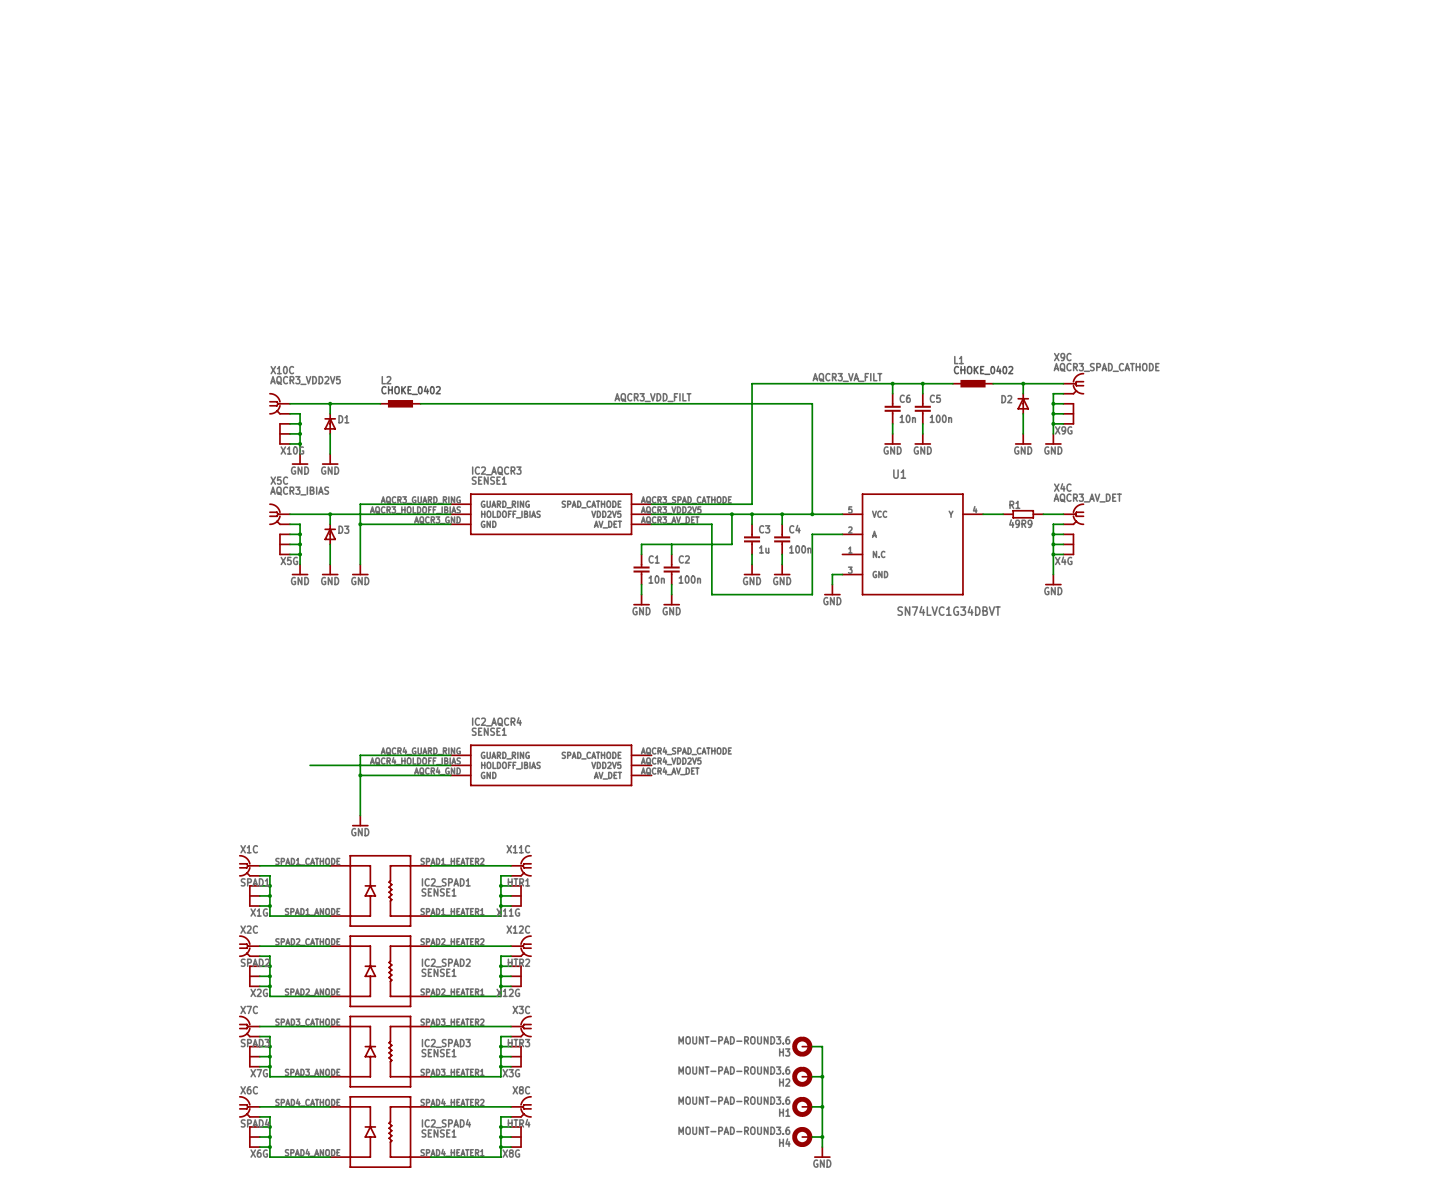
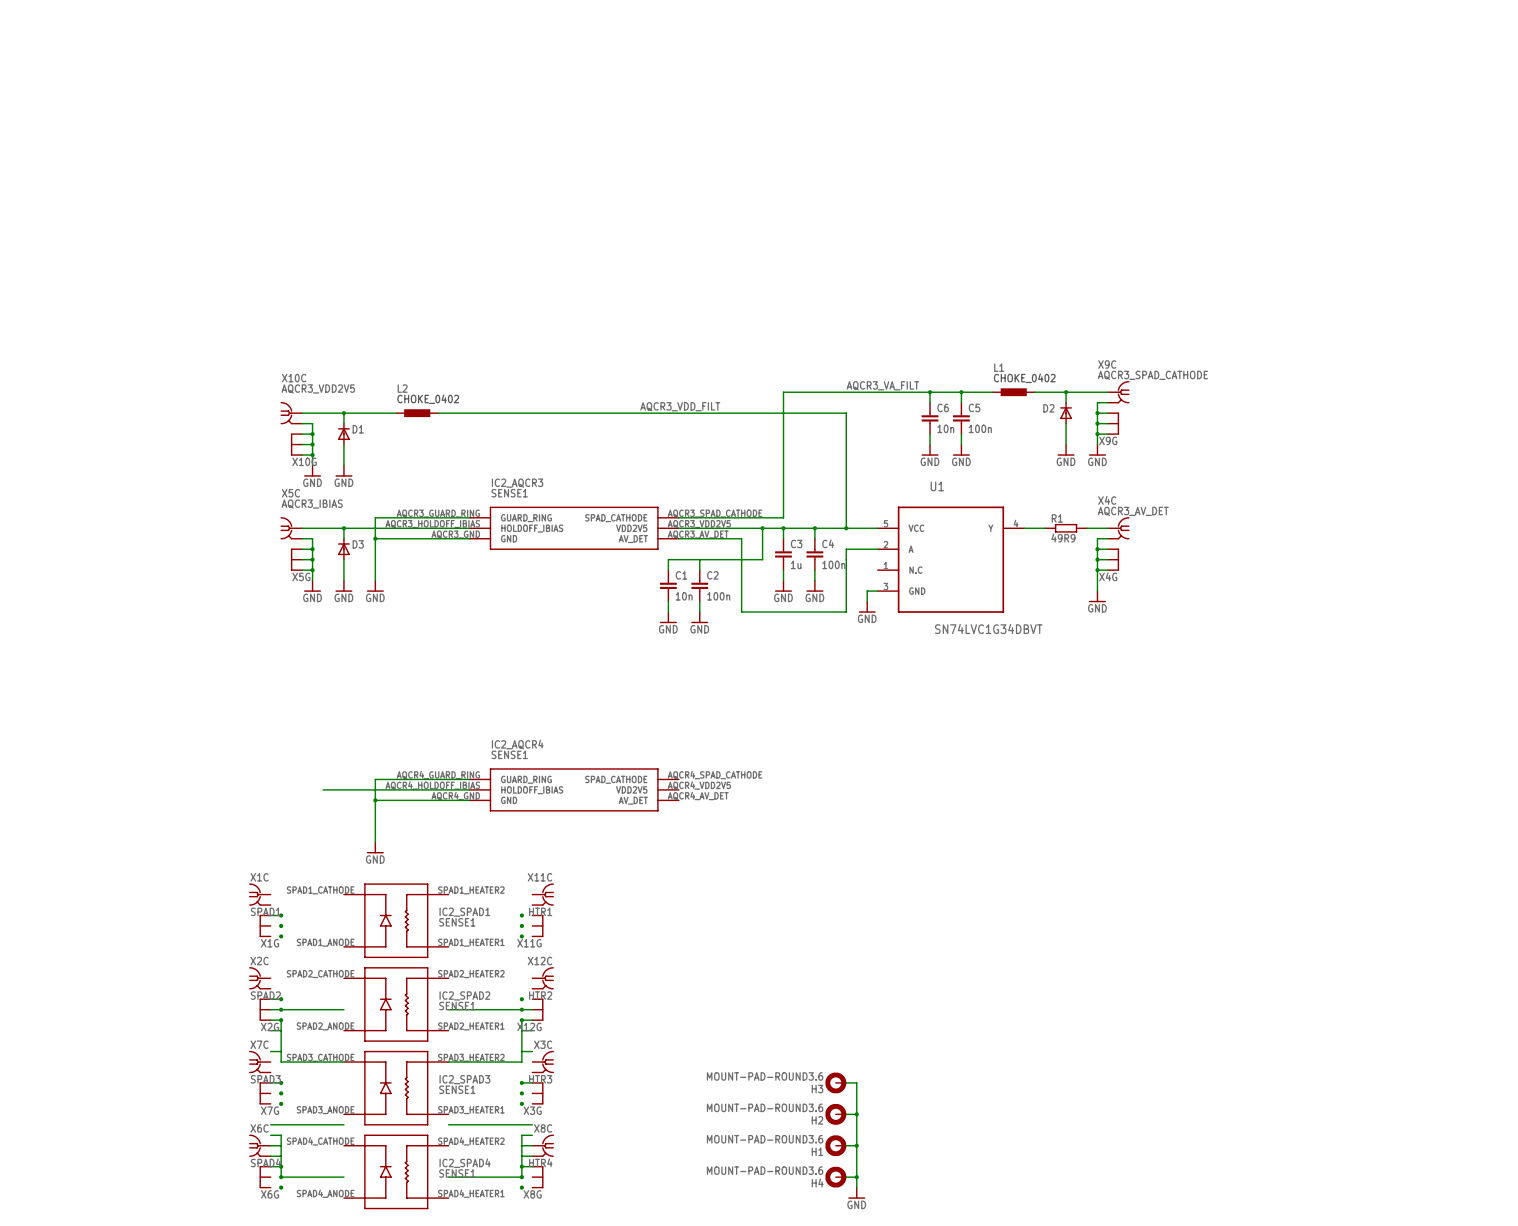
wire: (259, 865) (330, 865) -> none
wire: (430, 865) (510, 865) -> none
wire: (259, 875) (269, 875) (269, 916) (330, 916) -> none
wire: (510, 875) (500, 875) (500, 916) (430, 916) -> none
wire: (500, 885) (510, 885) -> none
wire: (259, 895) (269, 895) -> none
wire: (500, 895) (510, 895) -> none
wire: (259, 905) (269, 905) -> none
wire: (500, 905) (510, 905) -> none
wire: (259, 946) (330, 946) -> none
wire: (430, 946) (510, 946) -> none
wire: (259, 956) (269, 956) (269, 986) -> none
wire: (510, 956) (500, 956) (500, 986) -> none
wire: (500, 966) (510, 966) -> none
wire: (269, 996) (330, 996) -> (281, 1009) (343, 1009)
wire: (430, 996) (500, 996) -> (448, 1009) (521, 1009)
wire: (259, 1026) (269, 1026) -> (270, 1030) (281, 1030) (281, 1062)
wire: (500, 1026) (510, 1026) -> (521, 1062) (521, 1030) (532, 1030)
wire: (259, 1036) (269, 1036) (269, 1076) (330, 1076) -> none
wire: (510, 1036) (500, 1036) (500, 1076) (430, 1076) -> none
wire: (259, 1056) (269, 1056) -> (270, 1051) (281, 1051)
wire: (500, 1056) (510, 1056) -> (521, 1051) (532, 1051)
wire: (259, 1066) (269, 1066) -> none
wire: (500, 1066) (510, 1066) -> none
wire: none -> (270, 1124) (343, 1124)
wire: none -> (448, 1124) (532, 1124)
wire: none -> (270, 1135) (281, 1135) (281, 1156)
wire: none -> (532, 1135) (521, 1135) (521, 1156)
wire: (269, 1106) (330, 1106) -> (281, 1177) (343, 1177)
wire: (430, 1106) (500, 1106) -> (448, 1177) (521, 1177)
wire: (259, 1137) (269, 1137) (269, 1157) (330, 1157) -> none
wire: (510, 1137) (500, 1137) (500, 1157) (430, 1157) -> none
wire: (259, 1147) (269, 1147) -> none
wire: (500, 1147) (510, 1147) -> none

